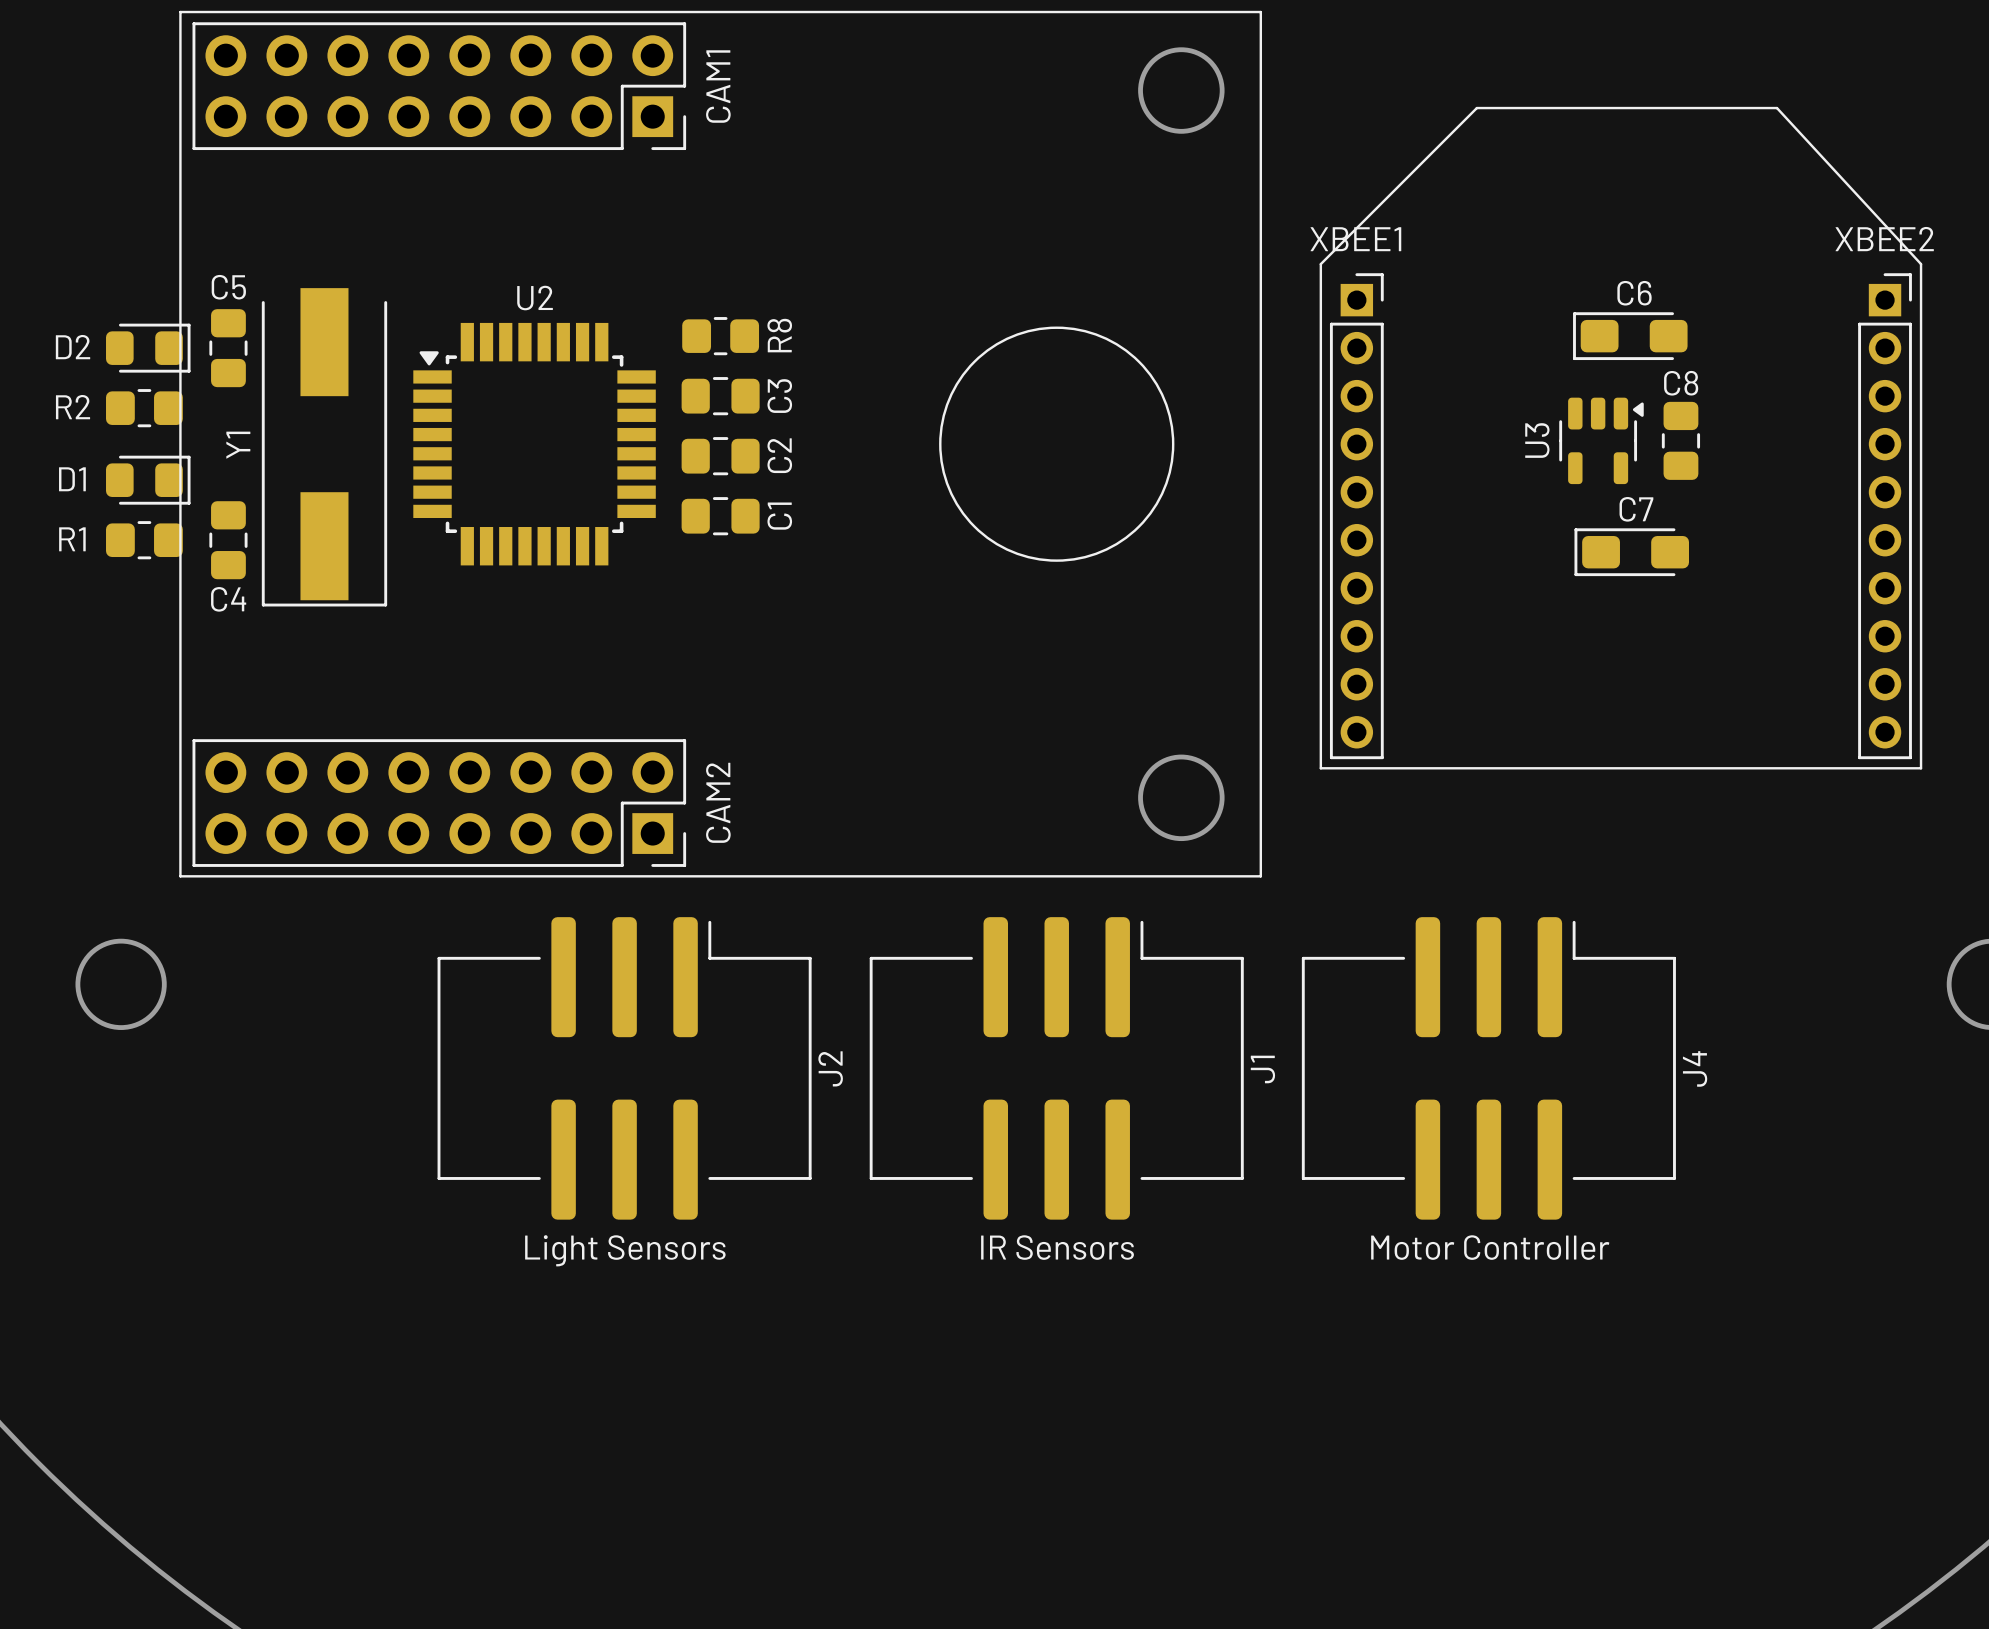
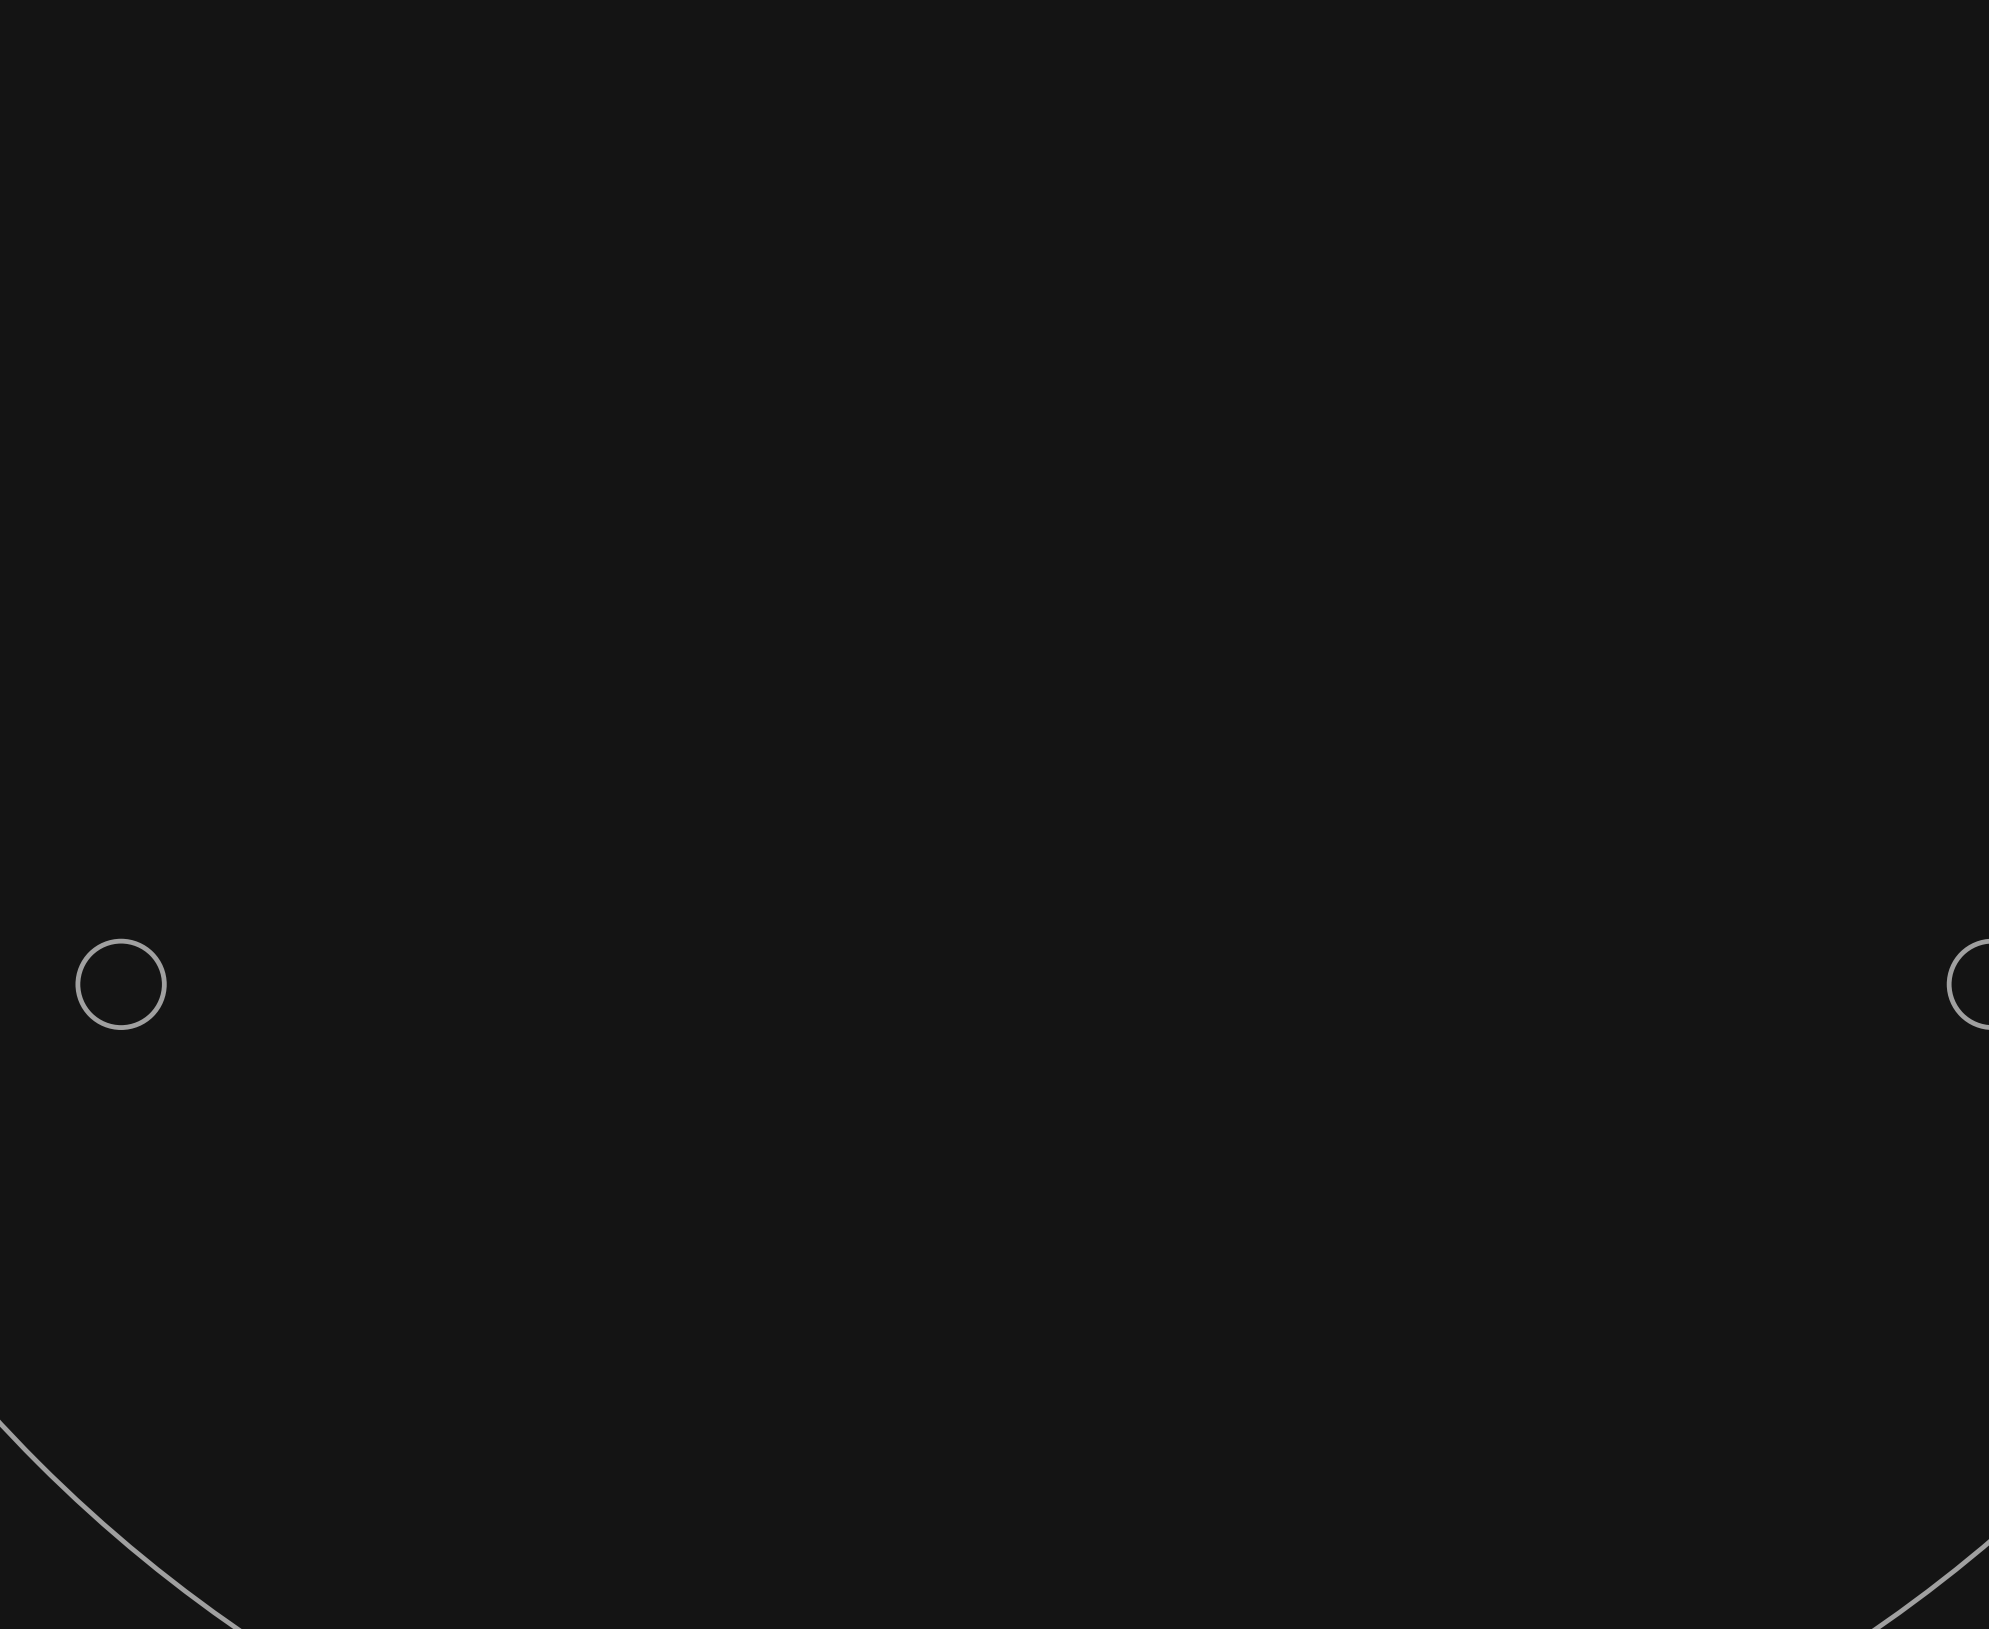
line: (180, 12) (180, 876) (1260, 876) (1260, 12) (180, 12) -> none
round board edge: [1138, 47, 1225, 134] -> none
CAM1: (439, 86) -> none
line: (1476, 108) (1320, 264) (1320, 768) (1921, 768) (1921, 264) (1776, 108) (1476, 108) -> none
drawing: [939, 326, 1175, 562] -> none
R8: (720, 336) -> none
C6: (1630, 336) -> none
D2: (148, 348) -> none
C5: (228, 348) -> none
C3: (720, 396) -> none
R2: (144, 408) -> none
U3: (1601, 440) -> none
C8: (1680, 440) -> none
U2: (534, 444) -> none
Y1: (324, 447) -> none
C2: (720, 456) -> none
D1: (148, 480) -> none
C1: (720, 516) -> none
XBEE1: (1356, 516) -> none
XBEE2: (1885, 516) -> none
R1: (144, 540) -> none
C4: (228, 540) -> none
C7: (1631, 552) -> none
round board edge: [1138, 754, 1225, 842] -> none
CAM2: (439, 803) -> none
J2: (624, 1068) -> none
J1: (1056, 1068) -> none
J4: (1488, 1068) -> none
text: IR Sensors (1057, 1247) -> none
text: Motor Controller (1490, 1247) -> none
text: Light Sensors (625, 1250) -> none

